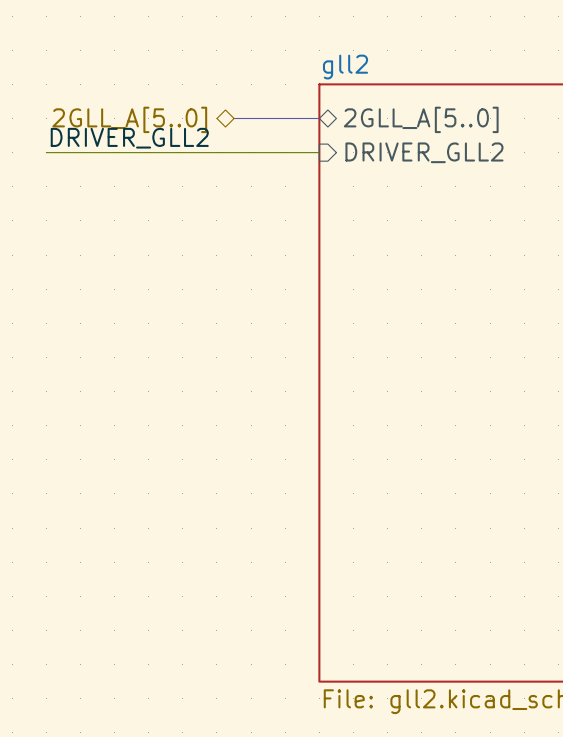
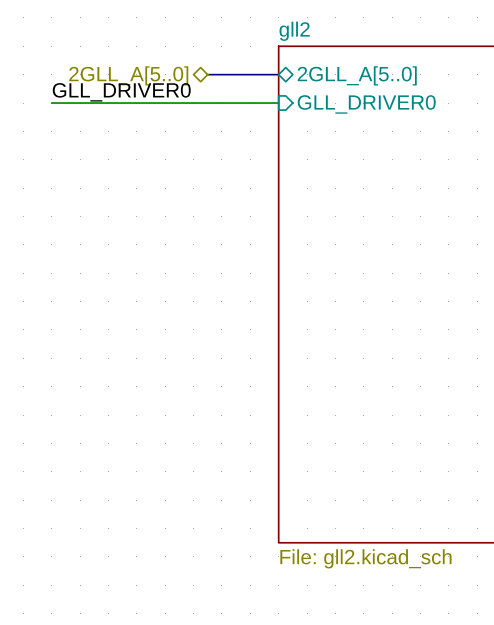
label: DRIVER_GLL2 (129, 138) -> GLL_DRIVER0 (121, 92)
sheet pin: DRIVER_GLL2 (424, 152) -> GLL_DRIVER0 (366, 104)

